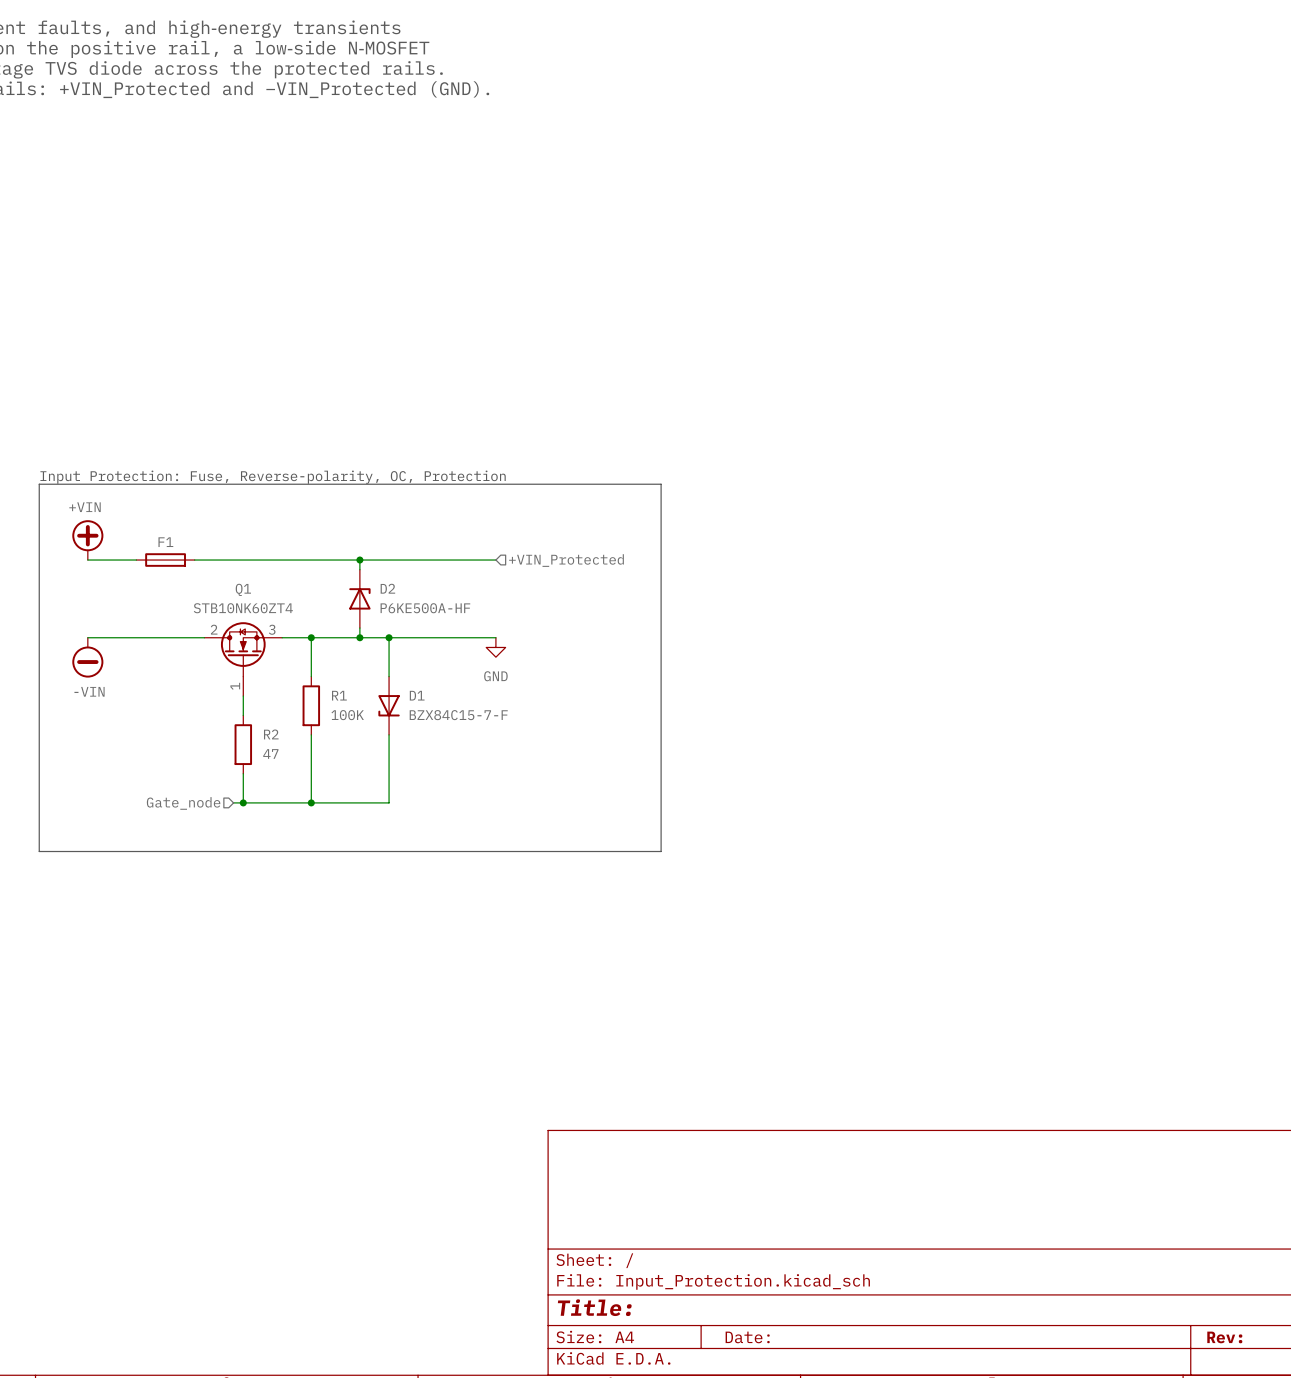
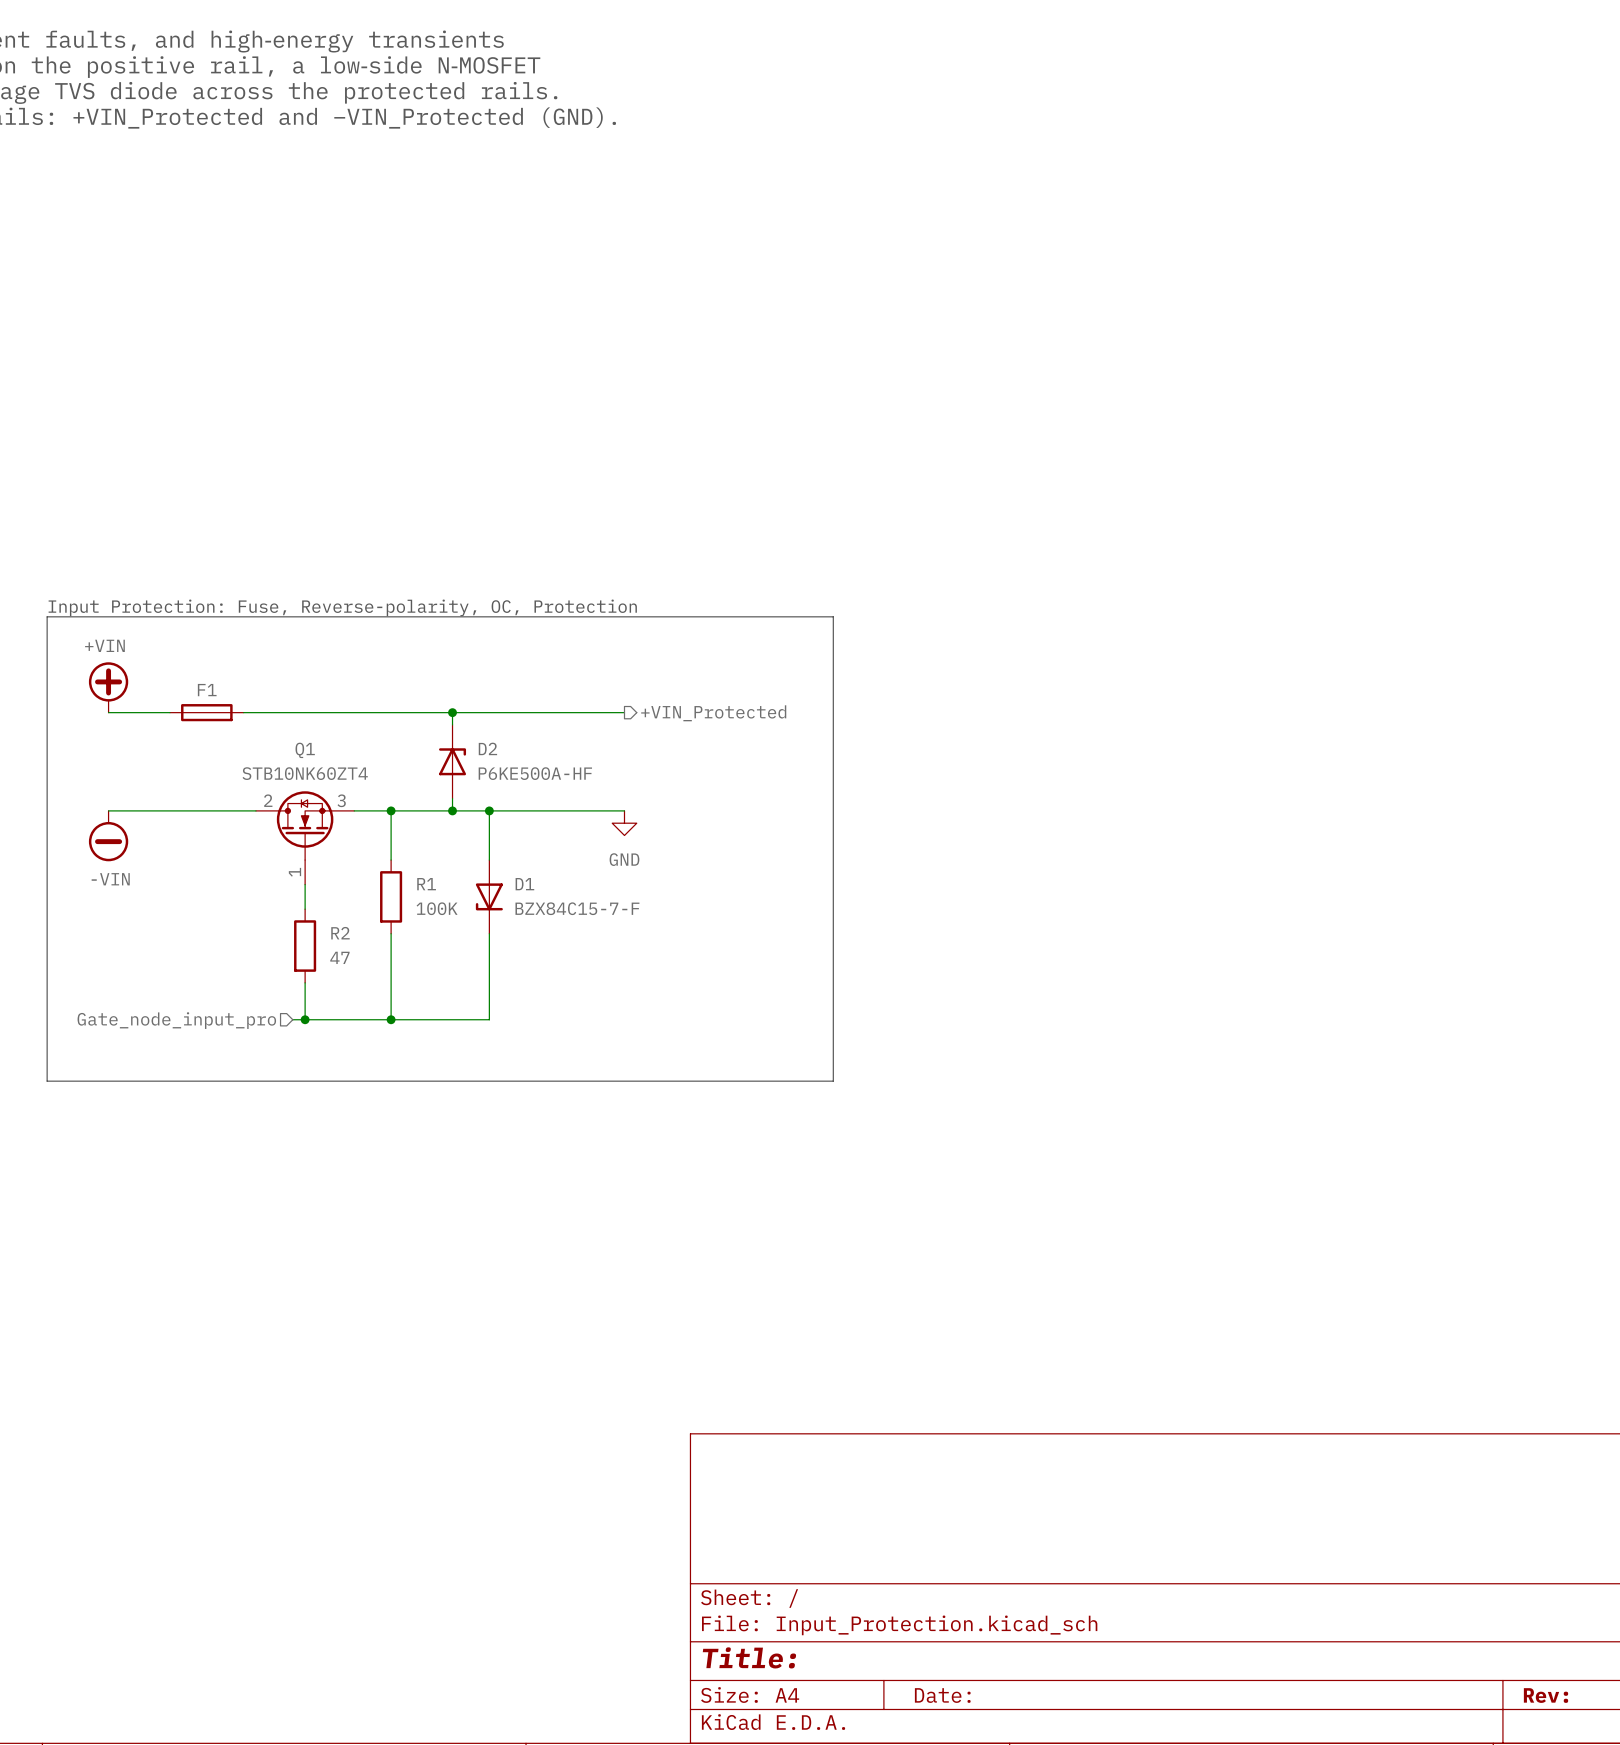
hierarchical label shape: input (566, 560) -> output (713, 713)
hierarchical label: Gate_node (183, 803) -> Gate_node_input_pro (176, 1020)

